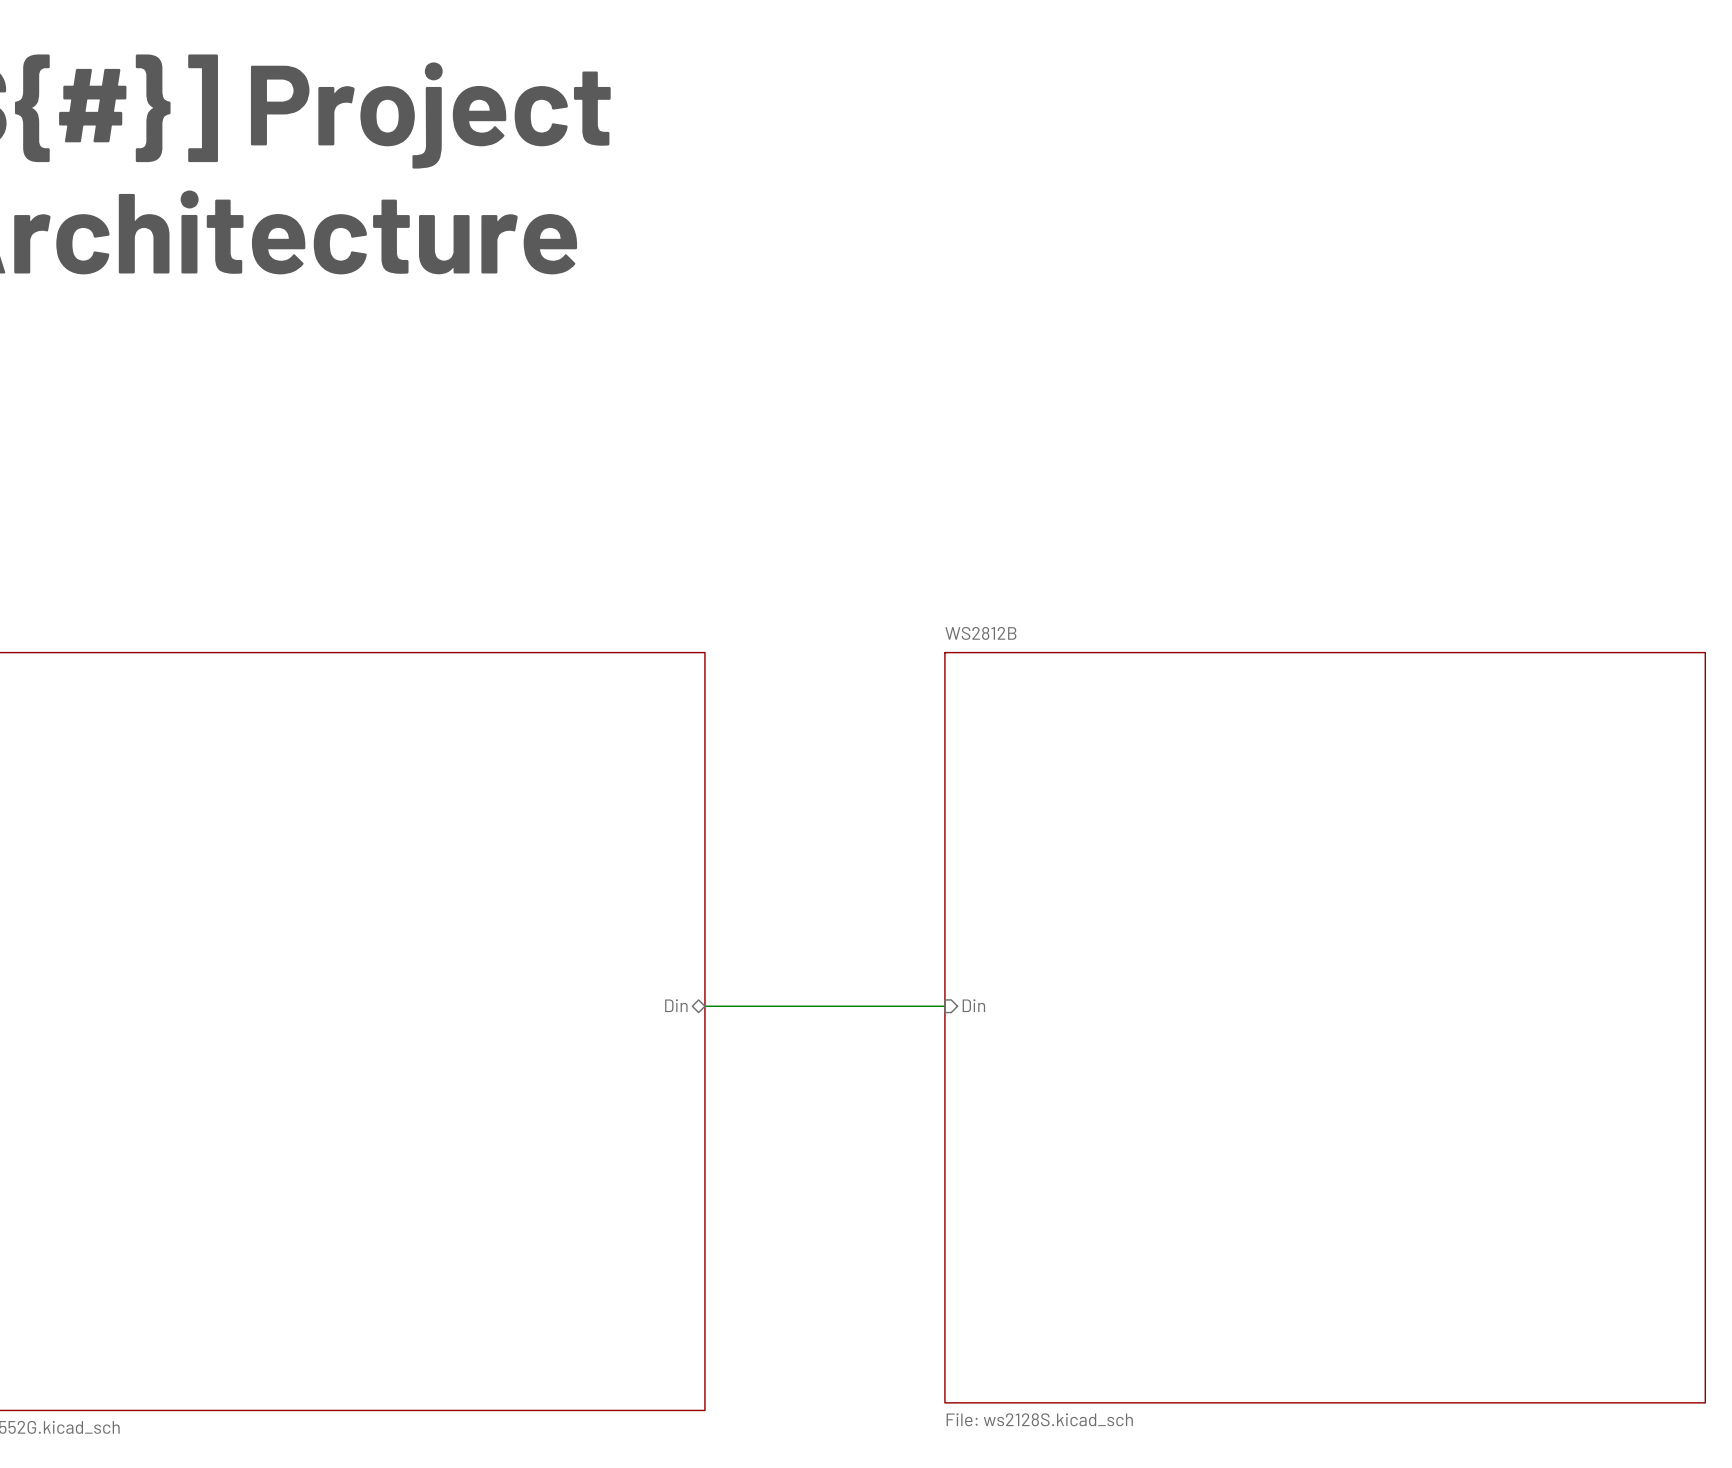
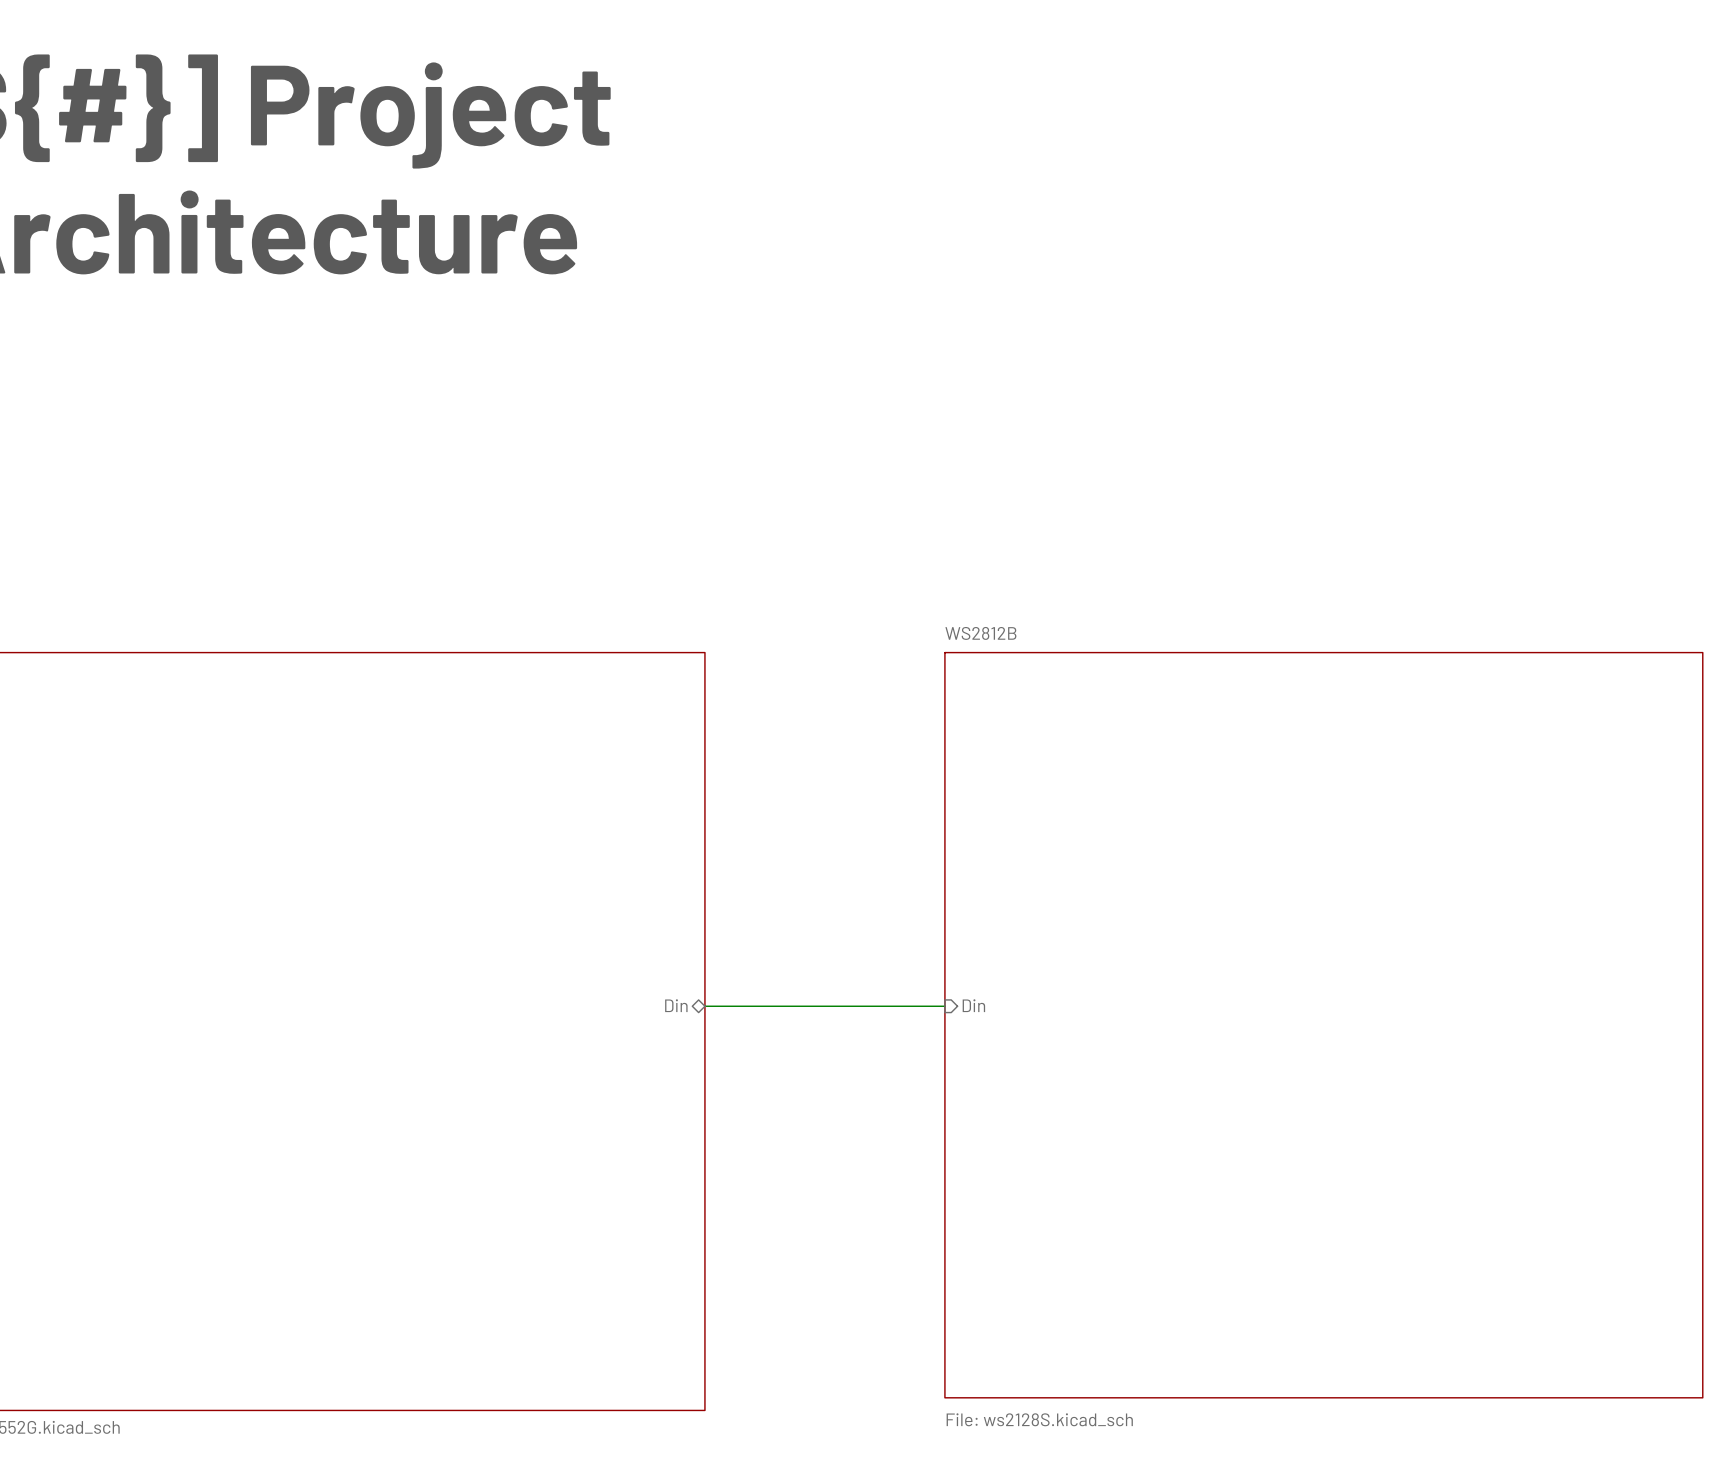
sheet WS2812B shape: [944, 652, 1706, 1404] -> [944, 652, 1704, 1399]

